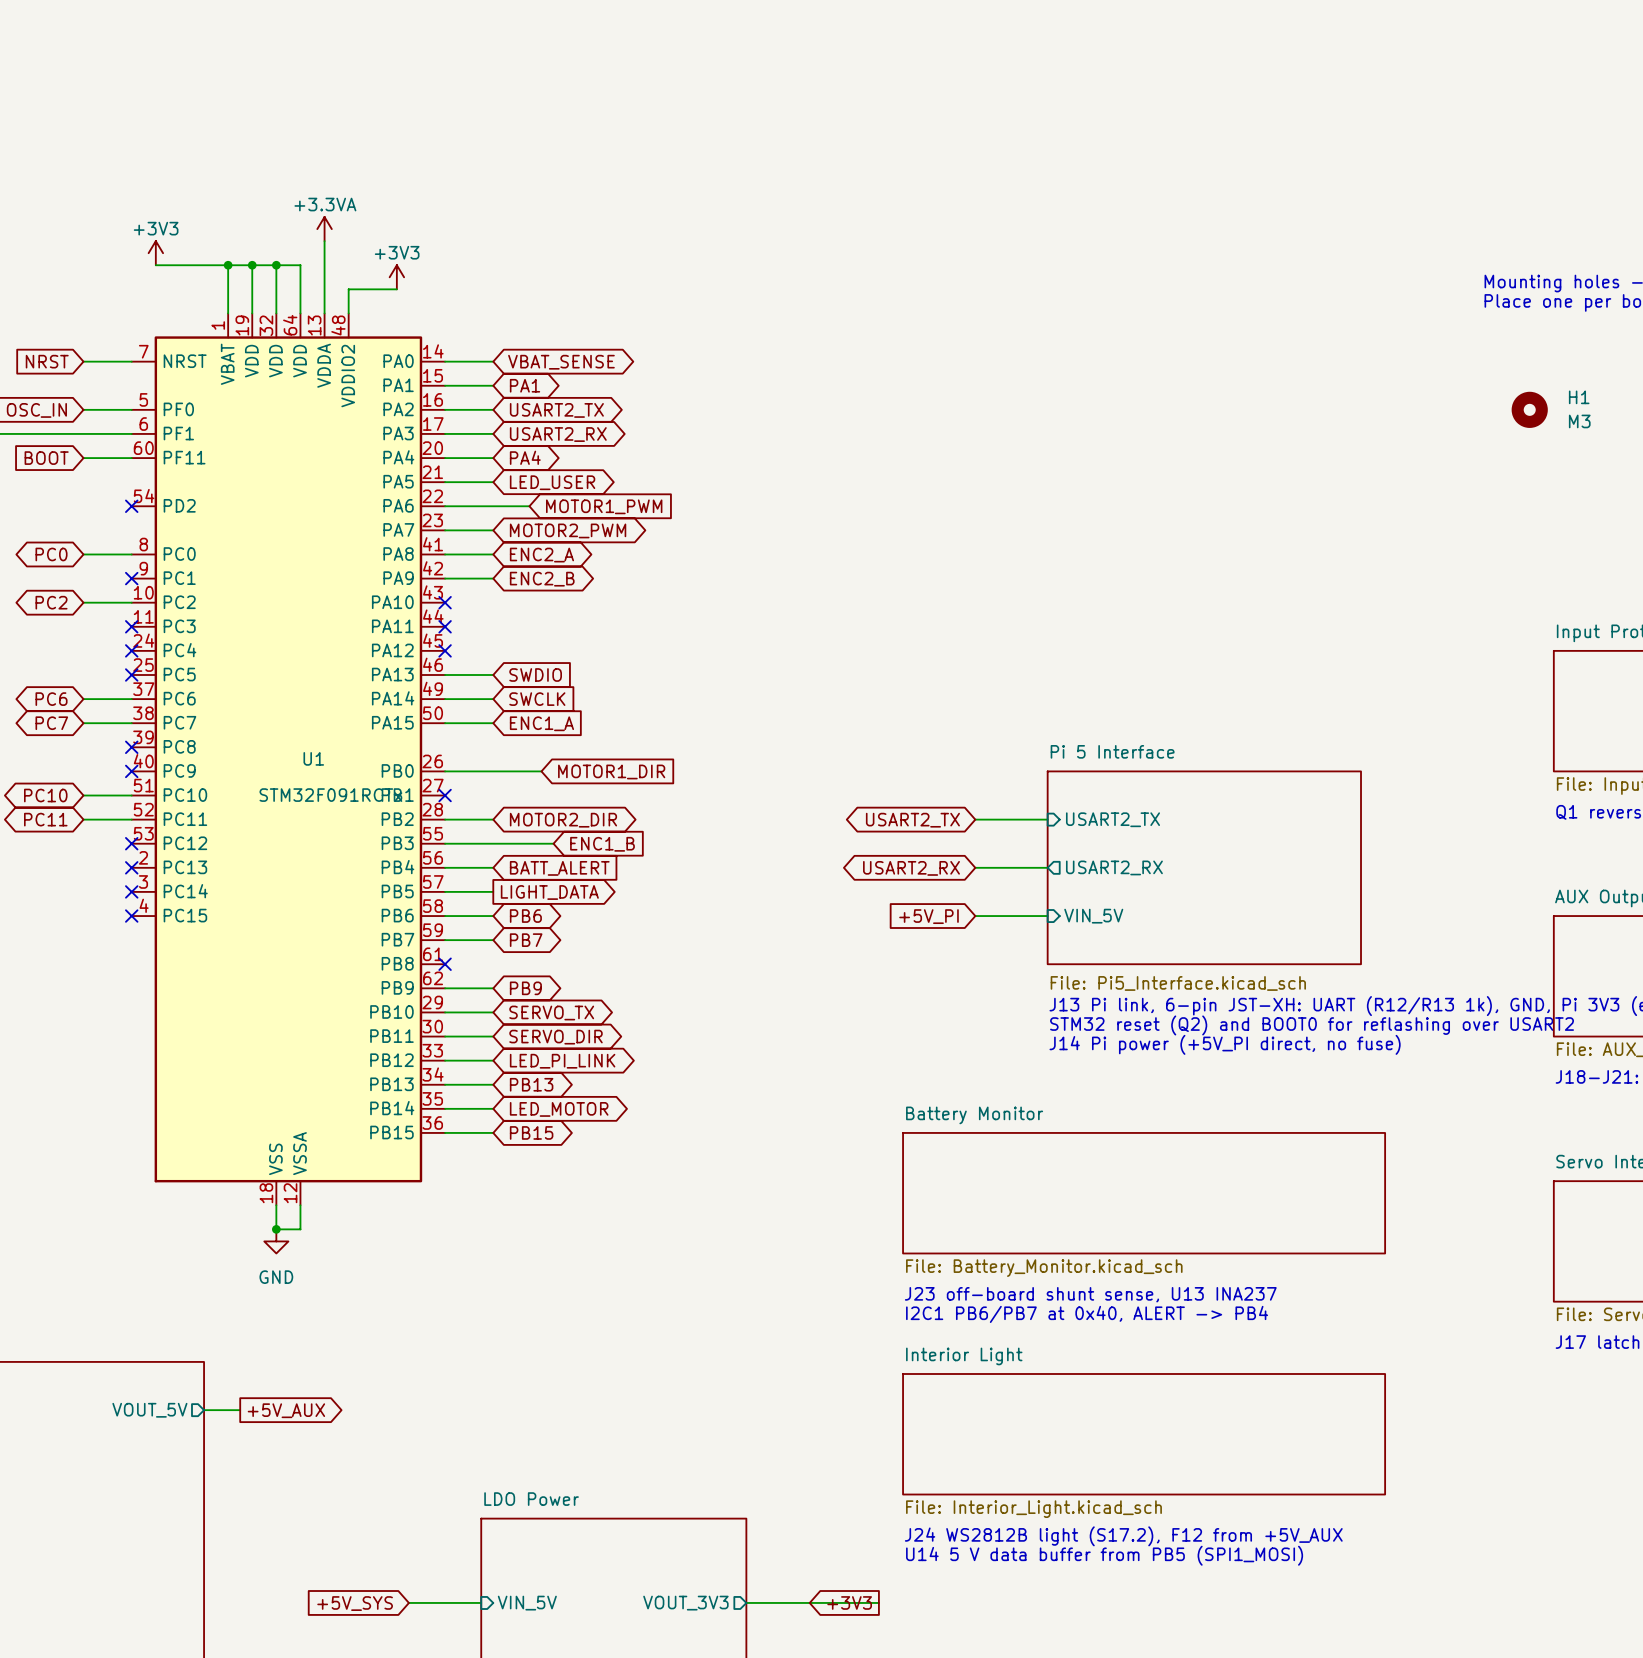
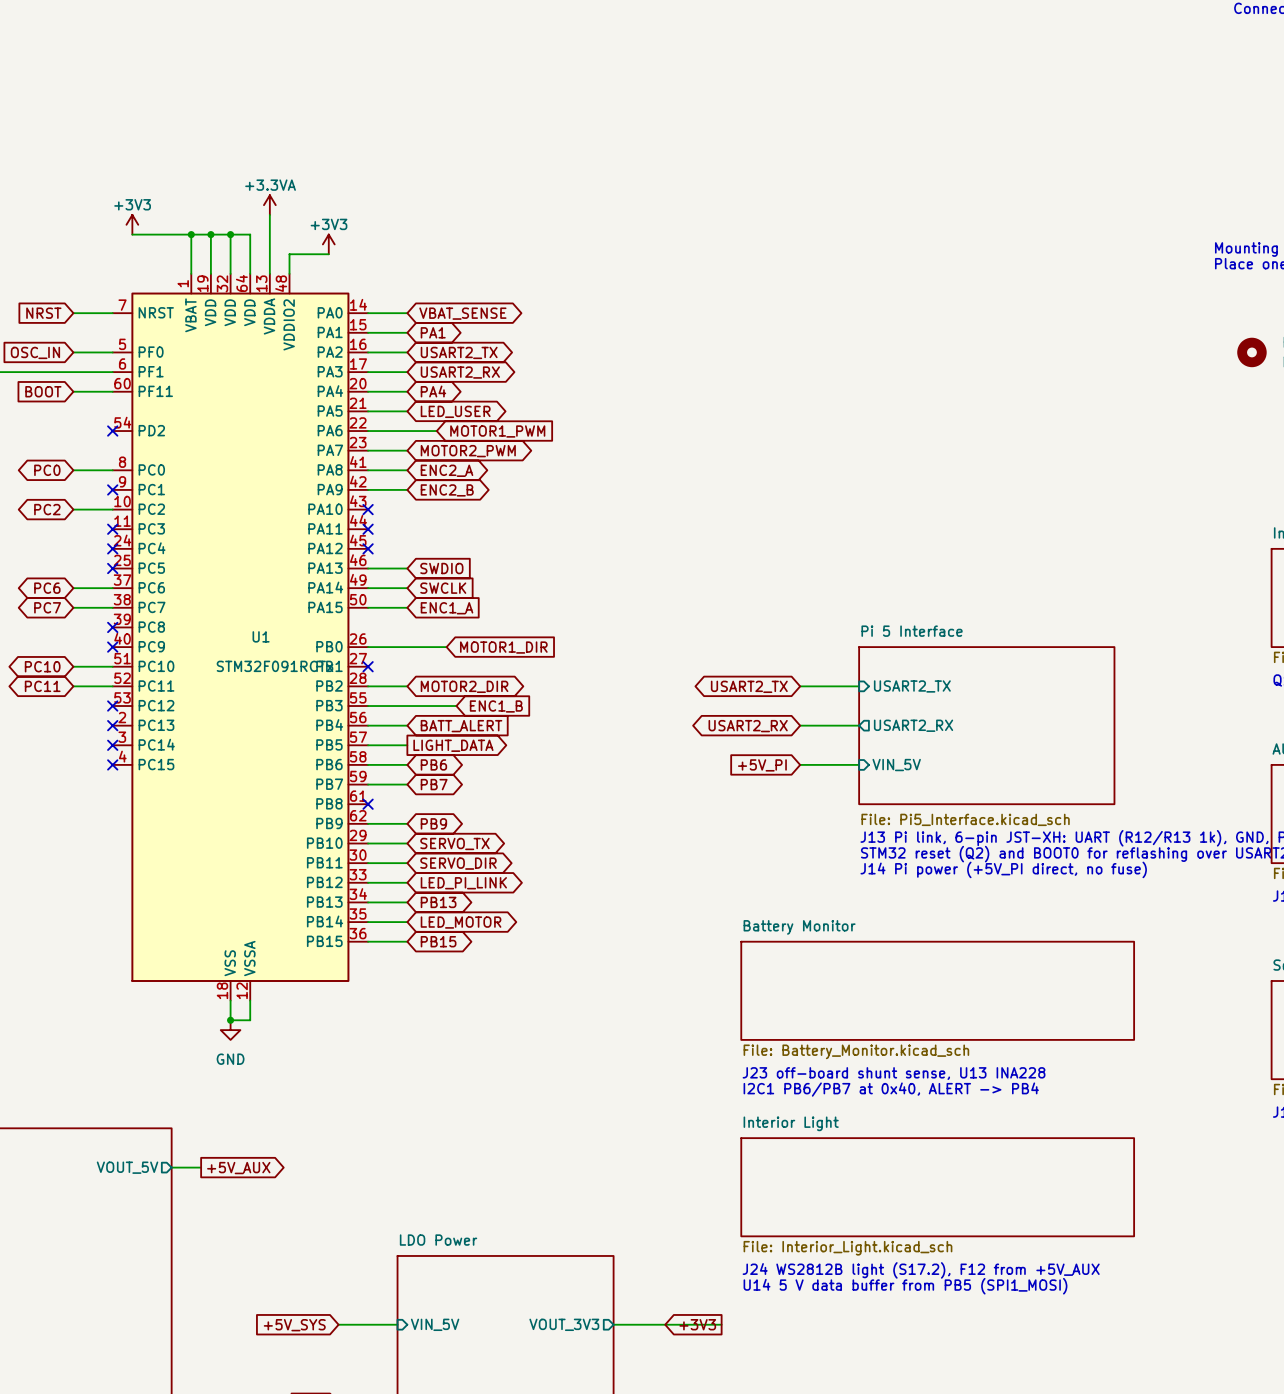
text: J23 off-board shunt sense, U13 INA237 (1090, 1294) -> J23 off-board shunt sense, U13 INA228 (894, 1073)

